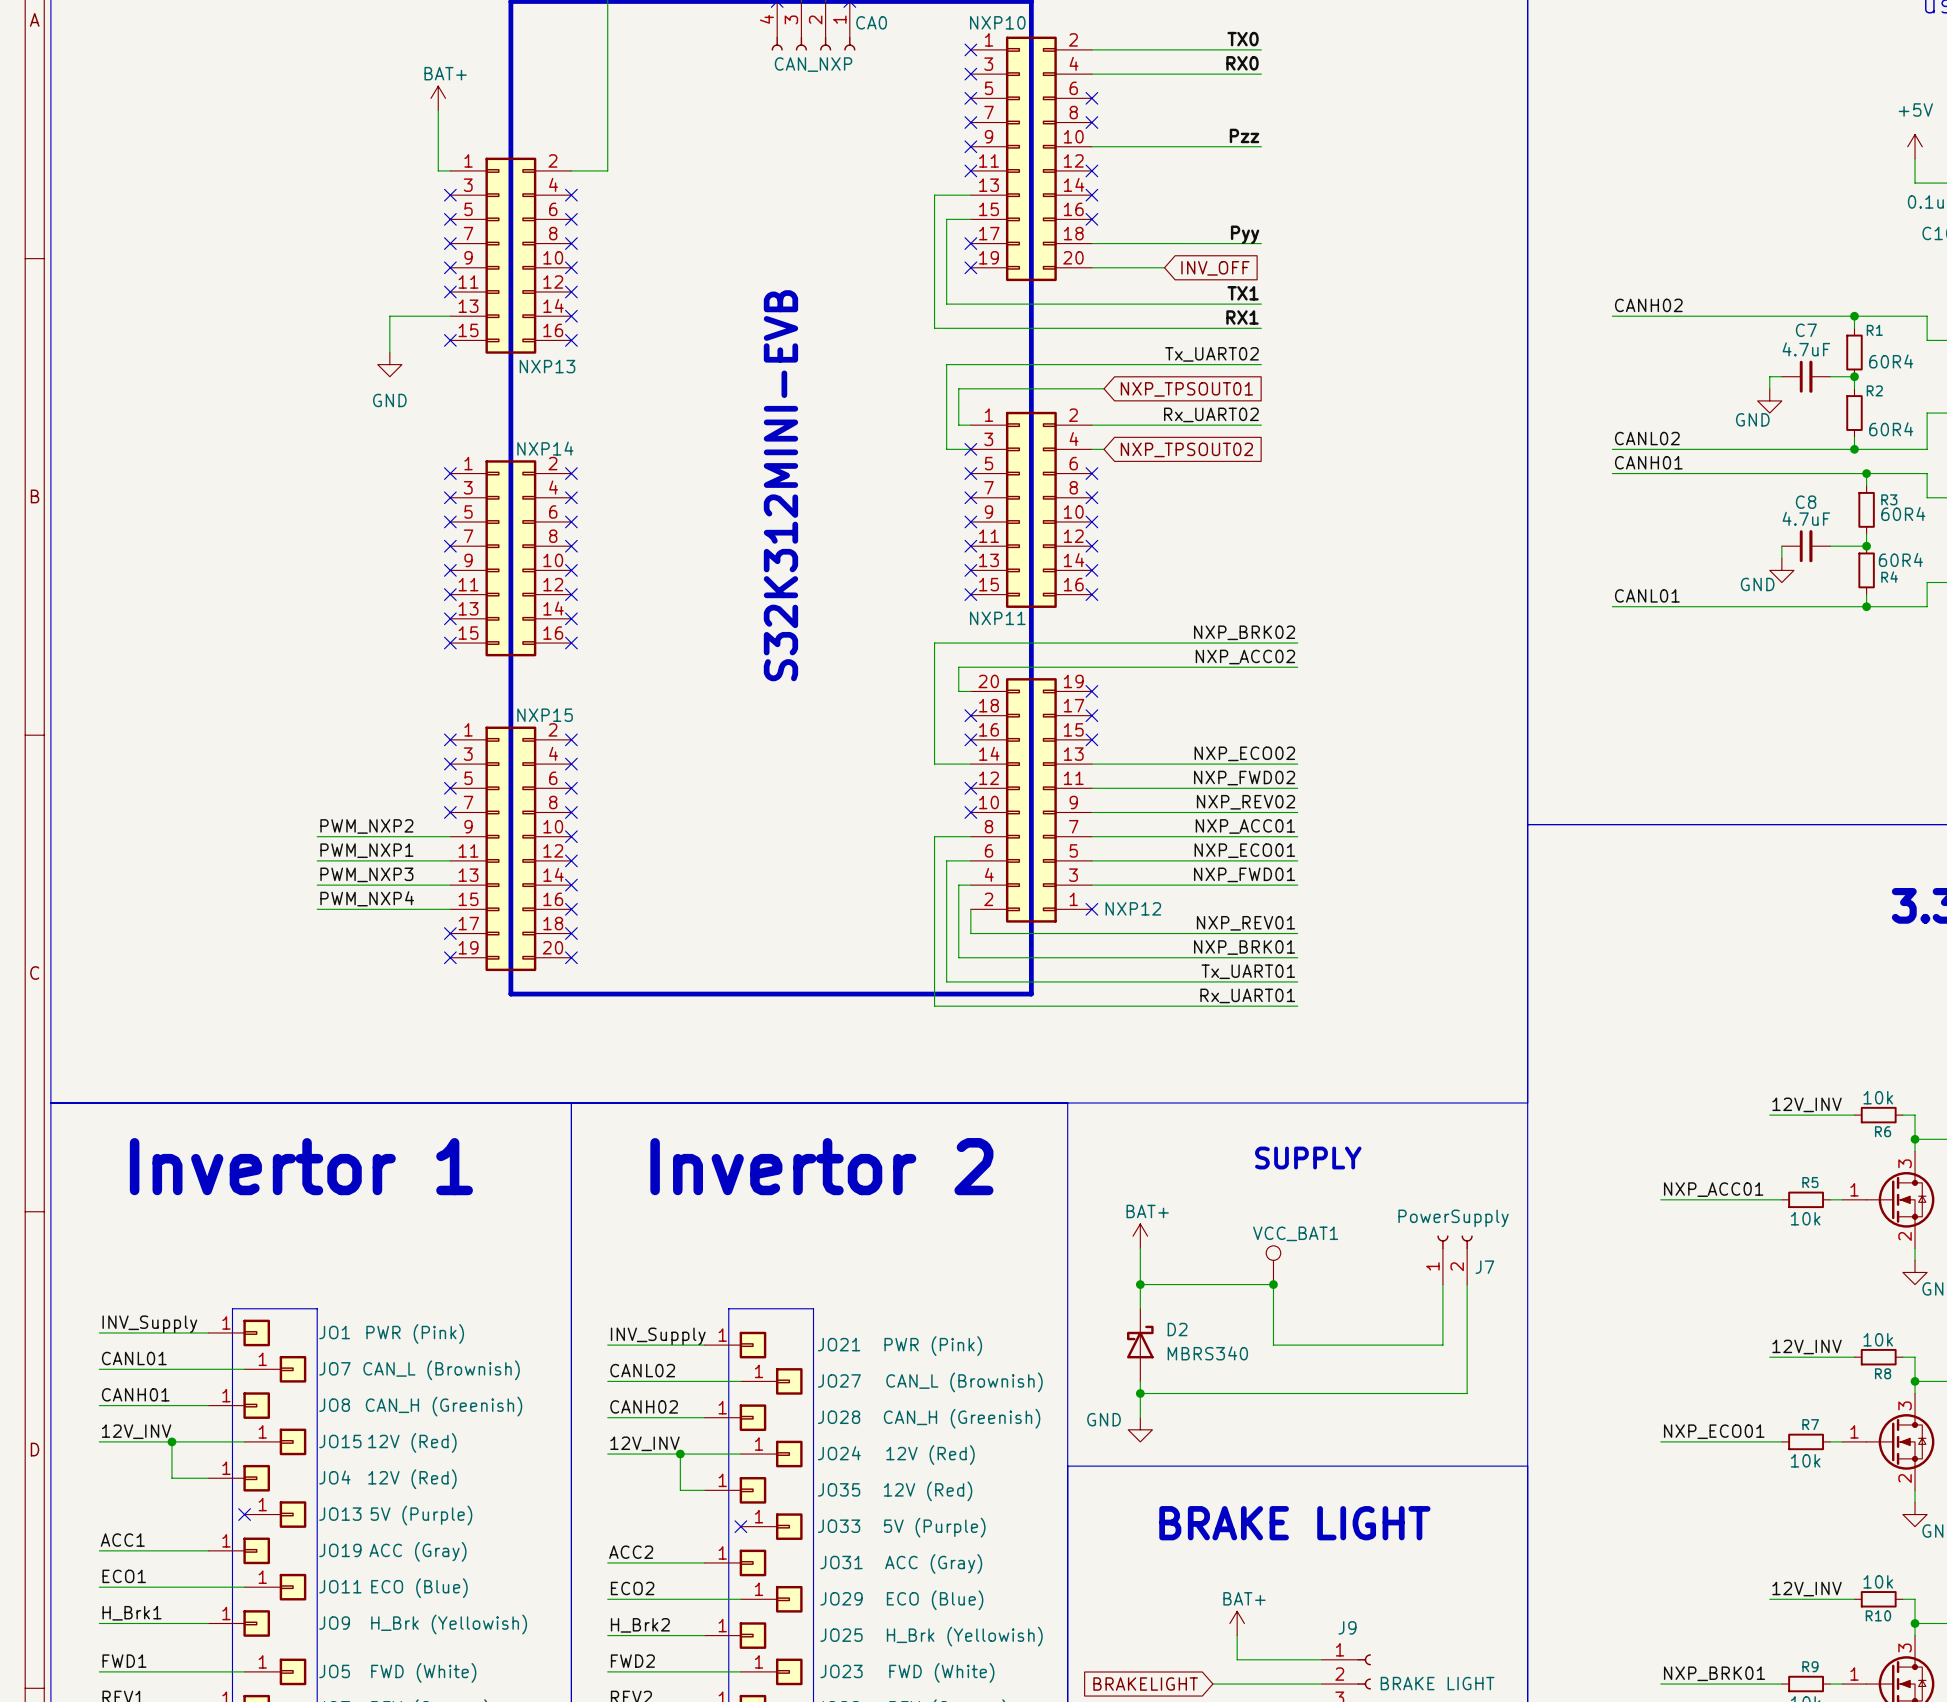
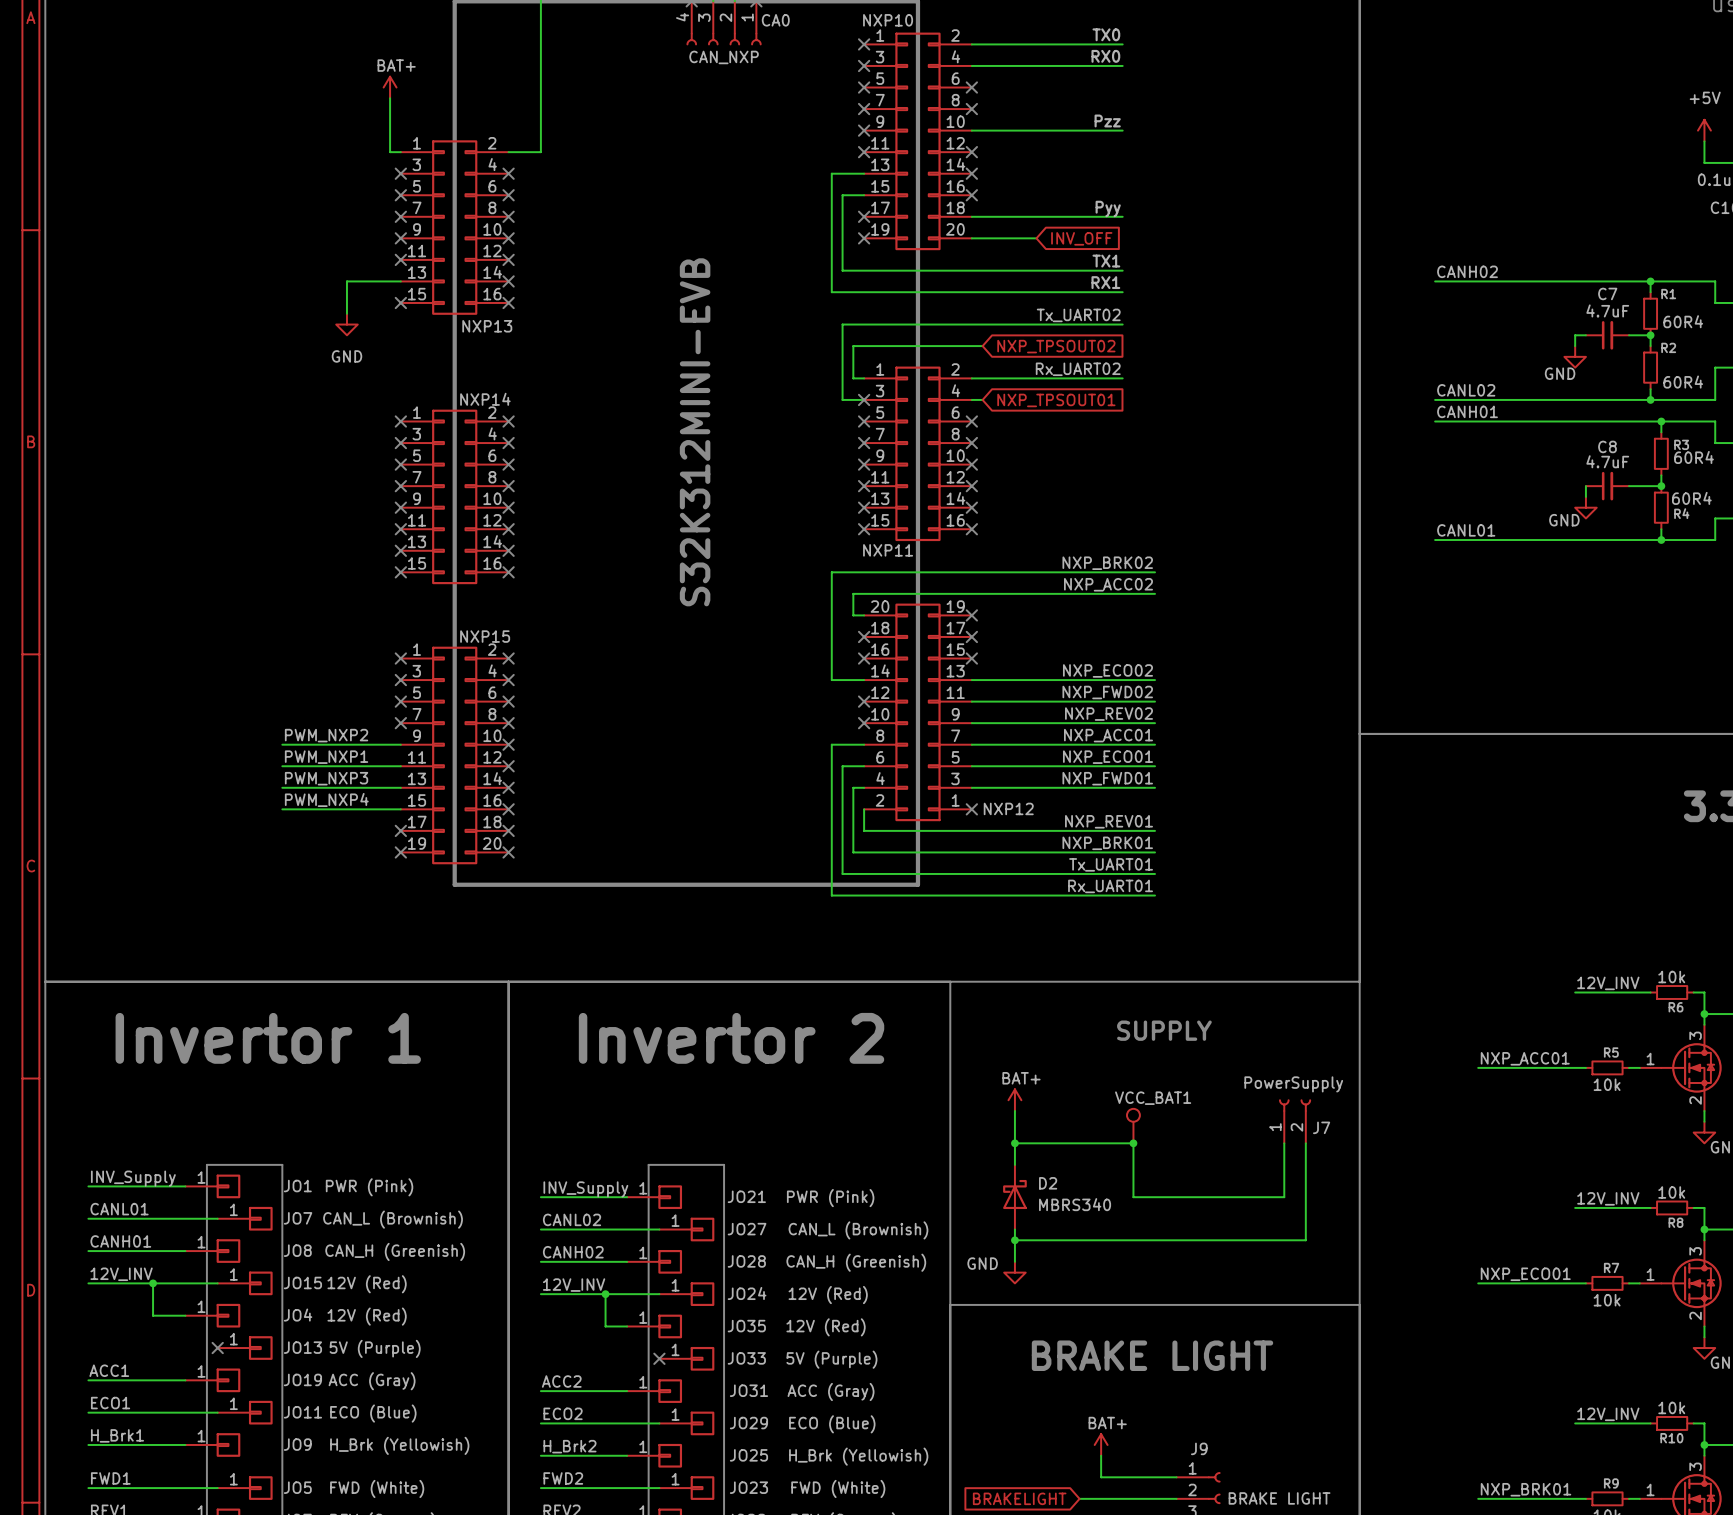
global label: NXP_TPSOUT01 (1186, 389) -> NXP_TPSOUT02 (1056, 346)
global label: NXP_TPSOUT02 (1186, 449) -> NXP_TPSOUT01 (1056, 400)

